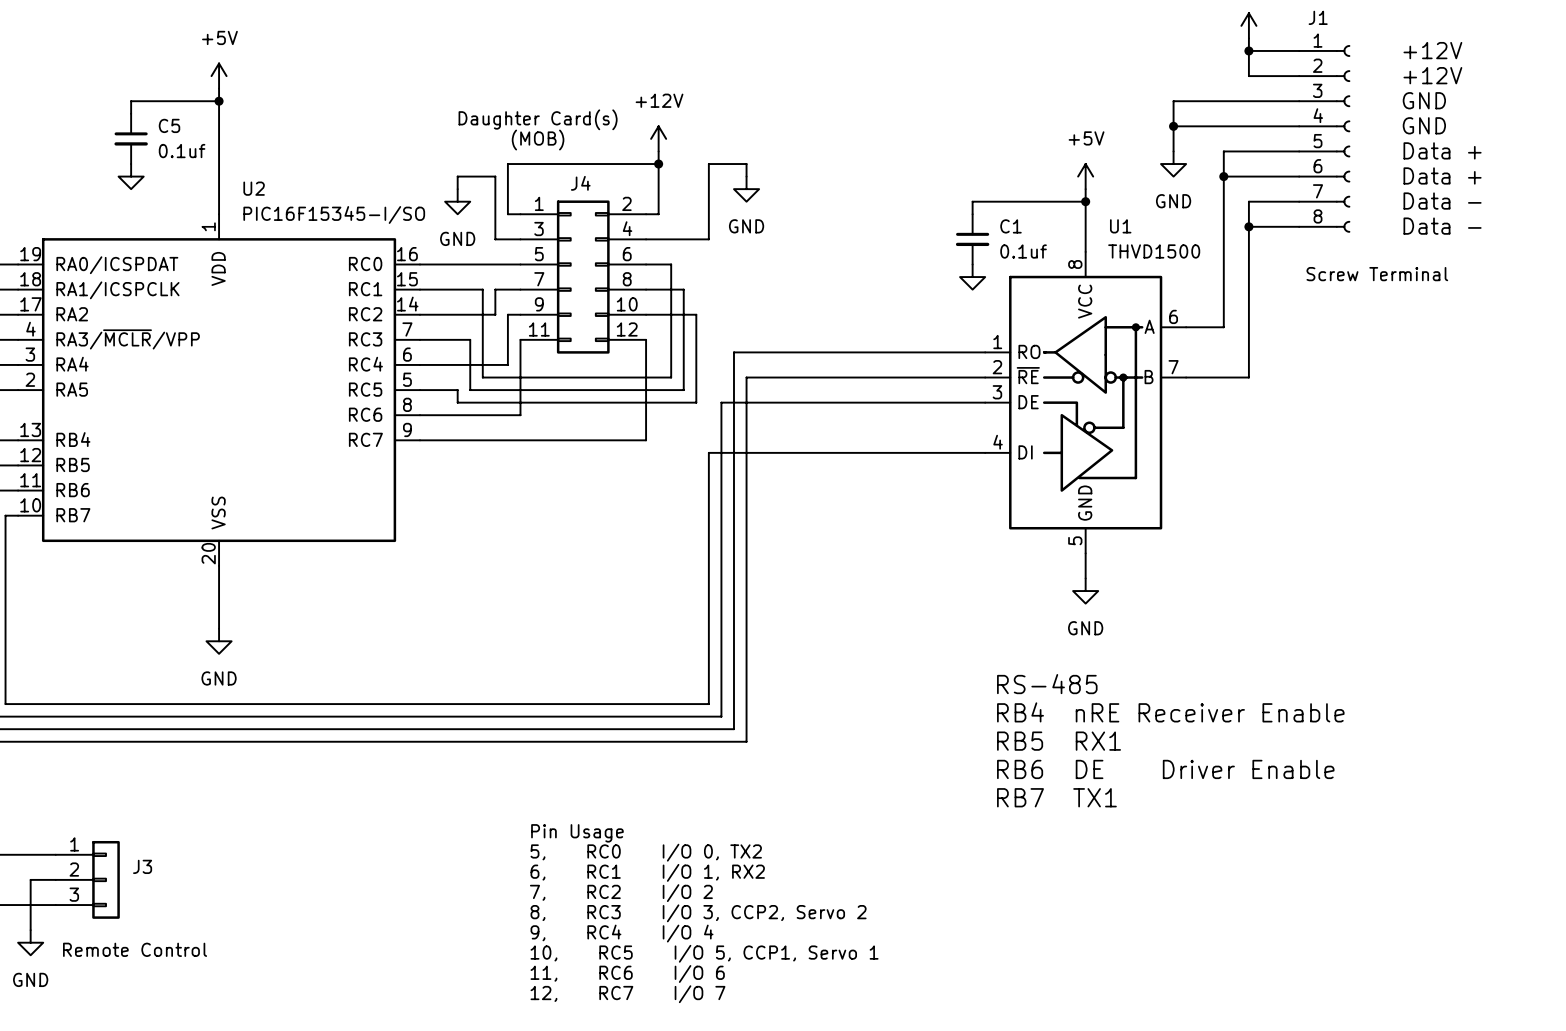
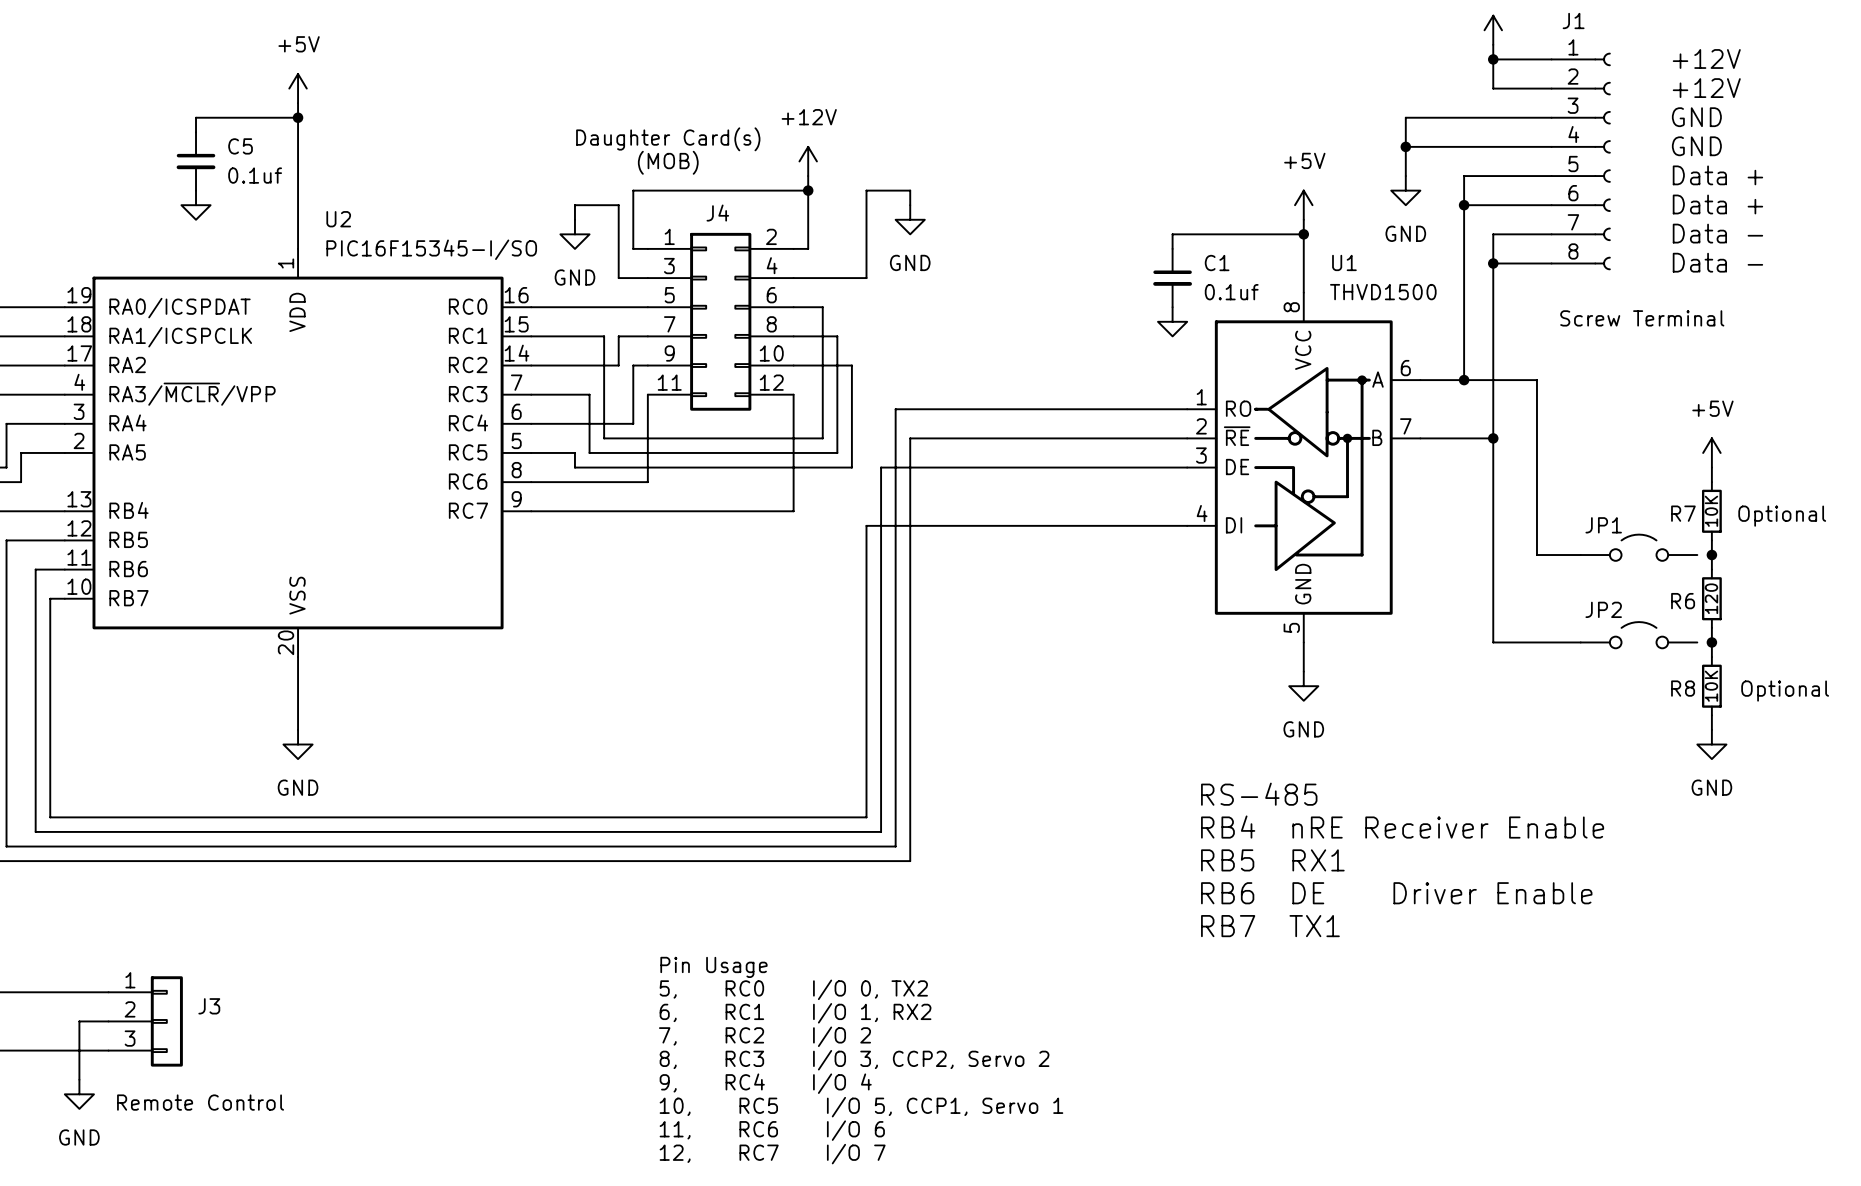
wire: none -> (1464, 380) (1536, 380) (1536, 555) (1580, 555)
junction: none -> (1464, 380)
wire: none -> (1493, 438) (1493, 642) (1580, 642)
junction: none -> (1493, 438)
power symbol: none -> +5V (1711, 452)
wire: none -> (1711, 467) (1711, 482)
R7: none -> 10K (1711, 511)
text: none -> Optional (1782, 516)
wire: none -> (1711, 540) (1711, 569)
JP1: none -> (1639, 547)
junction: none -> (1711, 555)
R6: none -> 120 (1711, 598)
wire: none -> (1711, 627) (1711, 657)
JP2: none -> (1639, 635)
junction: none -> (1711, 642)
R8: none -> 10K (1711, 686)
text: none -> Optional (1785, 691)
wire: none -> (1711, 715) (1711, 729)
power symbol: none -> GND (1711, 744)

